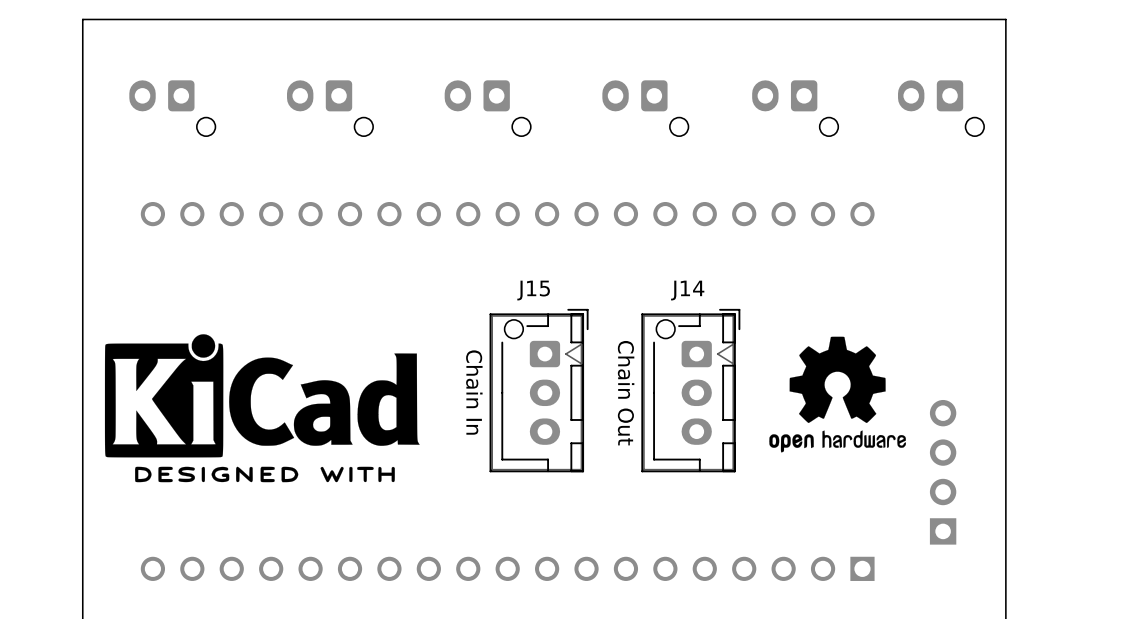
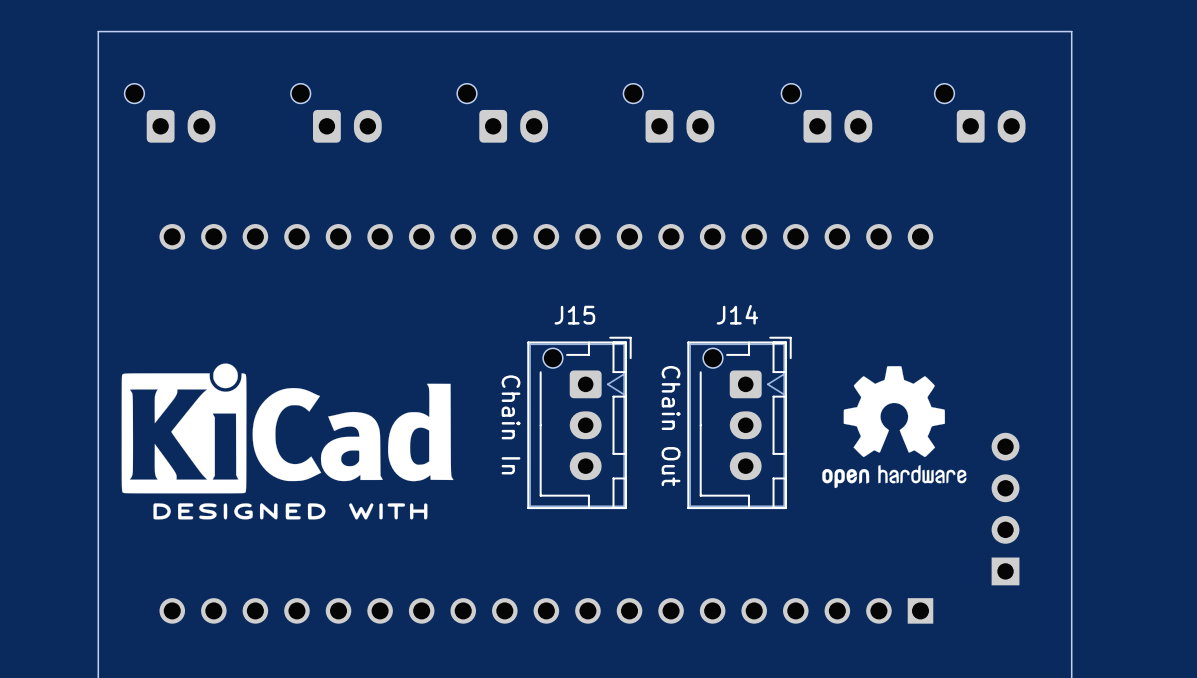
part rotation: 0° (172, 108) -> 180° (170, 113)
part rotation: 0° (330, 108) -> 180° (336, 113)
part rotation: 0° (487, 108) -> 180° (502, 113)
part rotation: 0° (645, 108) -> 180° (668, 113)
part rotation: 0° (795, 108) -> 180° (826, 113)
part rotation: 0° (941, 108) -> 180° (980, 113)

